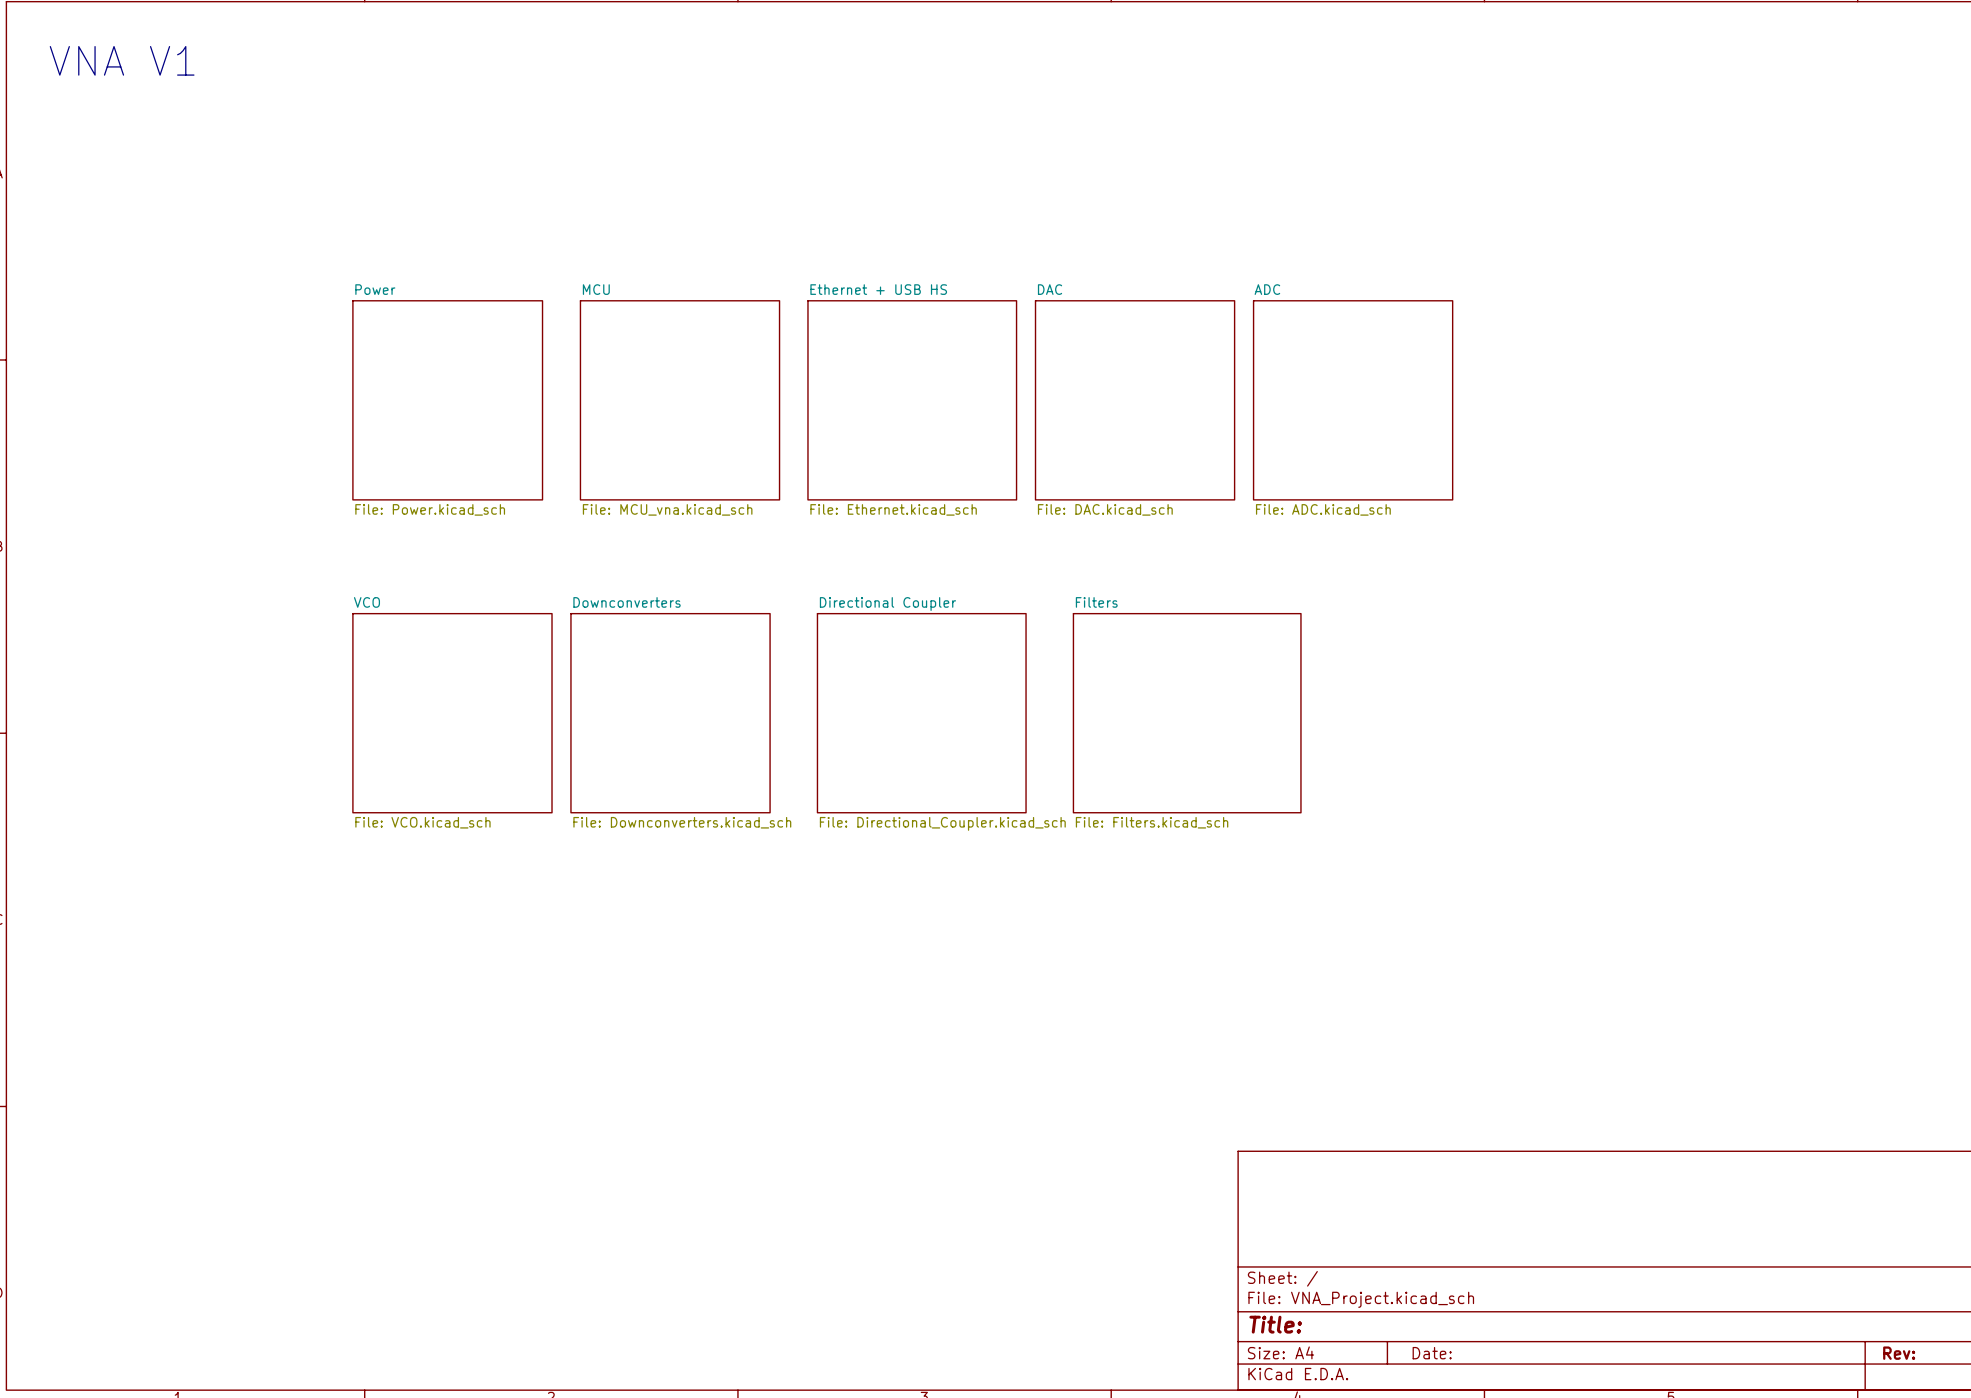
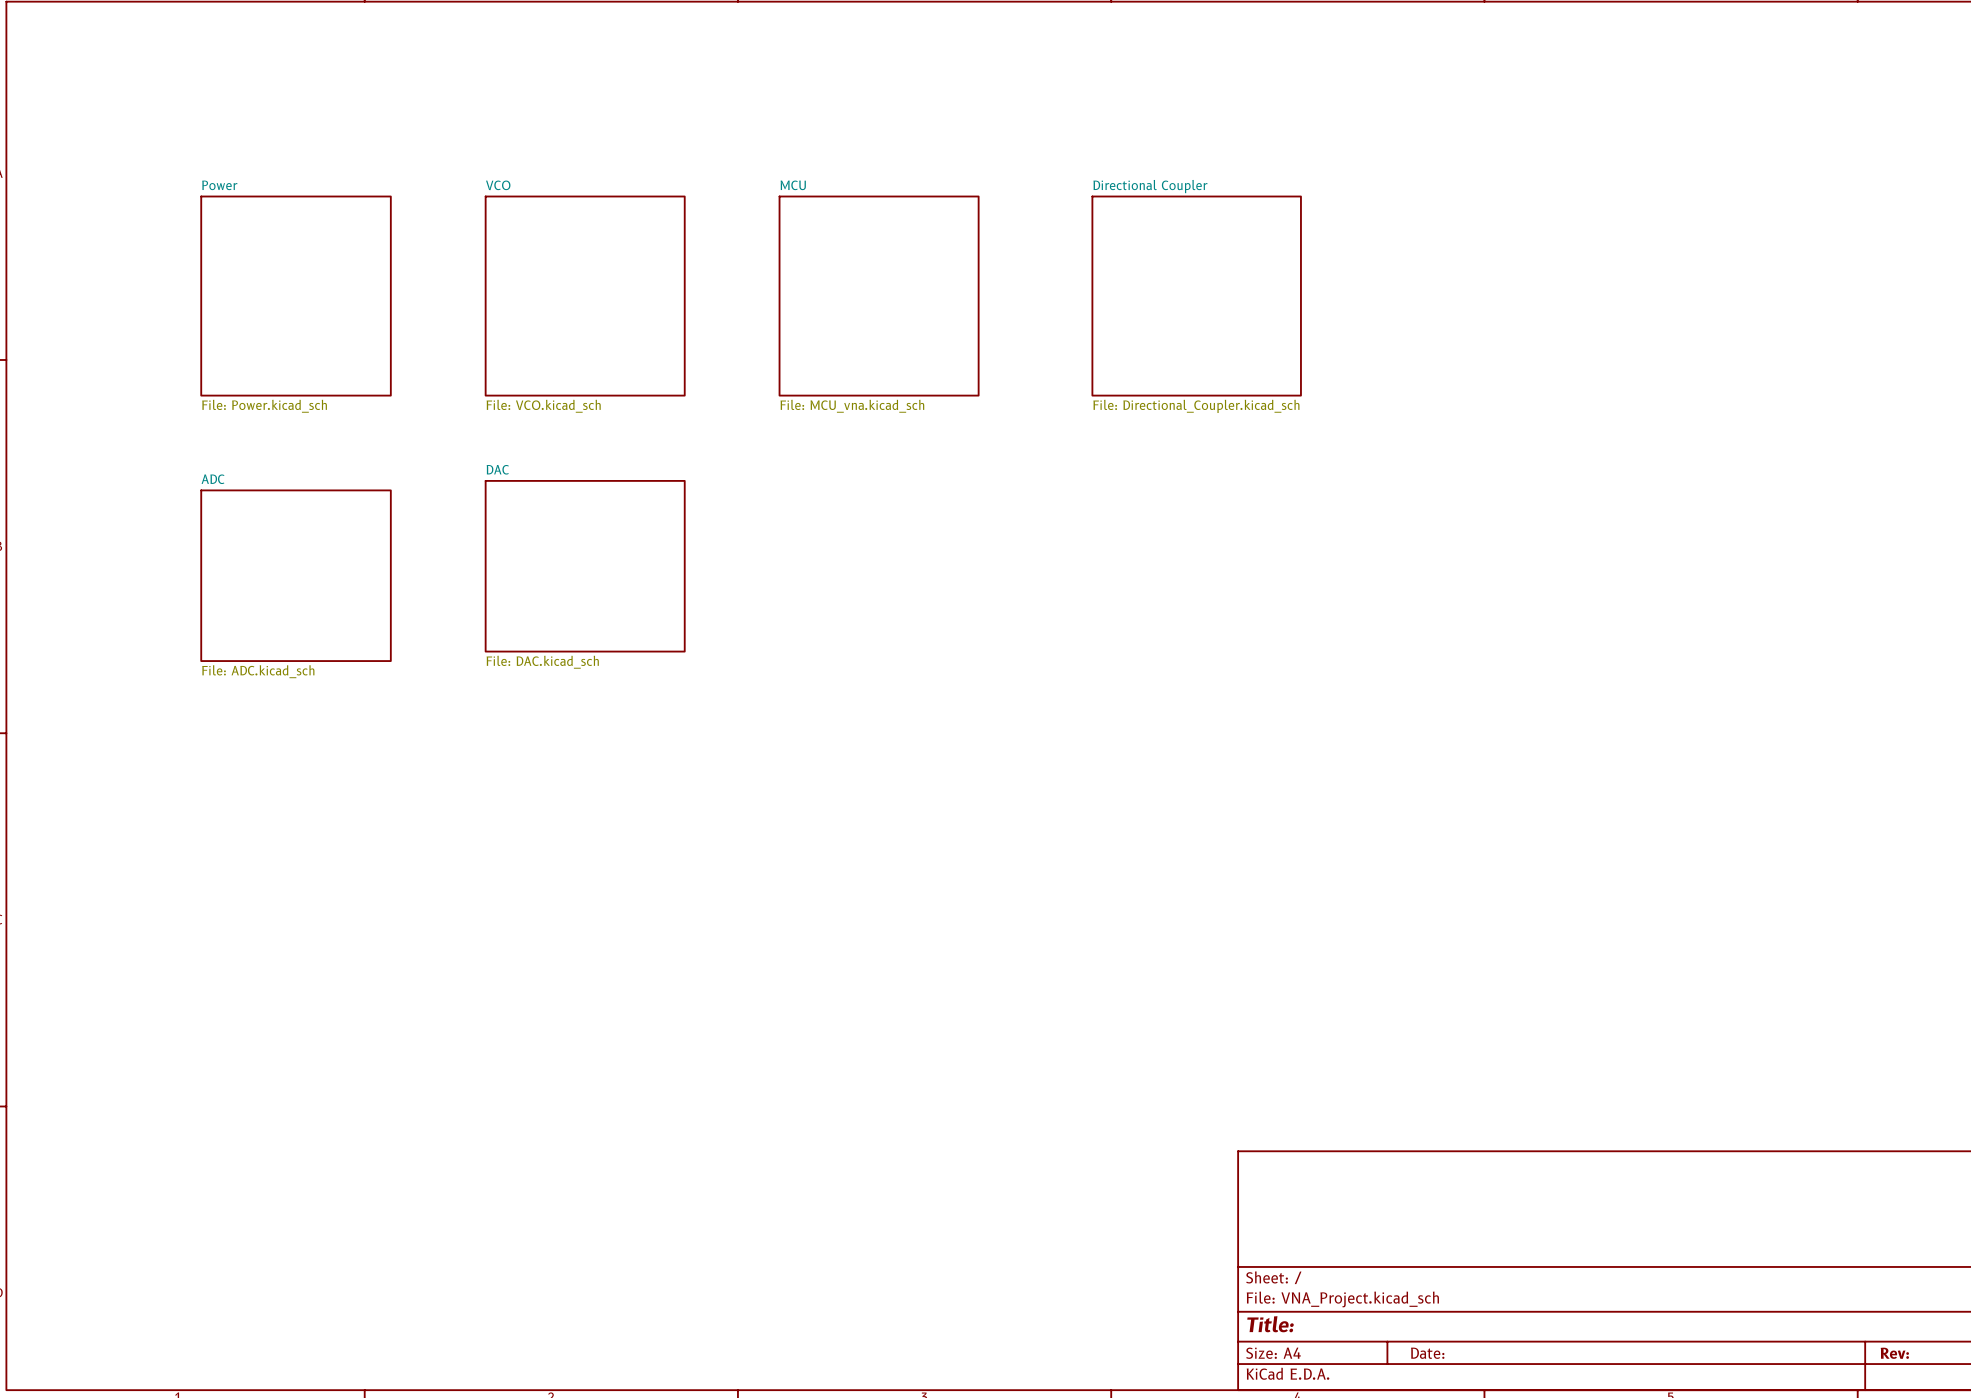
text: VNA V1 (122, 60) -> none
sheet VCO: none -> File: VCO.kicad_sch (585, 296)
sheet MCU: none -> File: MCU_vna.kicad_sch (879, 296)
sheet Directional Coupler: none -> File: Directional_Coupler.kicad_sch (1196, 296)
sheet Power position: (447, 400) -> (296, 296)
sheet MCU: File: MCU_vna.kicad_sch (679, 400) -> none
sheet Ethernet + USB HS: File: Ethernet.kicad_sch (912, 400) -> none
sheet DAC: File: DAC.kicad_sch (1135, 400) -> none
sheet ADC: File: ADC.kicad_sch (1353, 400) -> none
sheet DAC: none -> File: DAC.kicad_sch (585, 566)
sheet ADC: none -> File: ADC.kicad_sch (296, 575)
sheet VCO: File: VCO.kicad_sch (452, 713) -> none
sheet Downconverters: File: Downconverters.kicad_sch (670, 713) -> none
sheet Directional Coupler: File: Directional_Coupler.kicad_sch (921, 713) -> none
sheet Filters: File: Filters.kicad_sch (1187, 713) -> none

